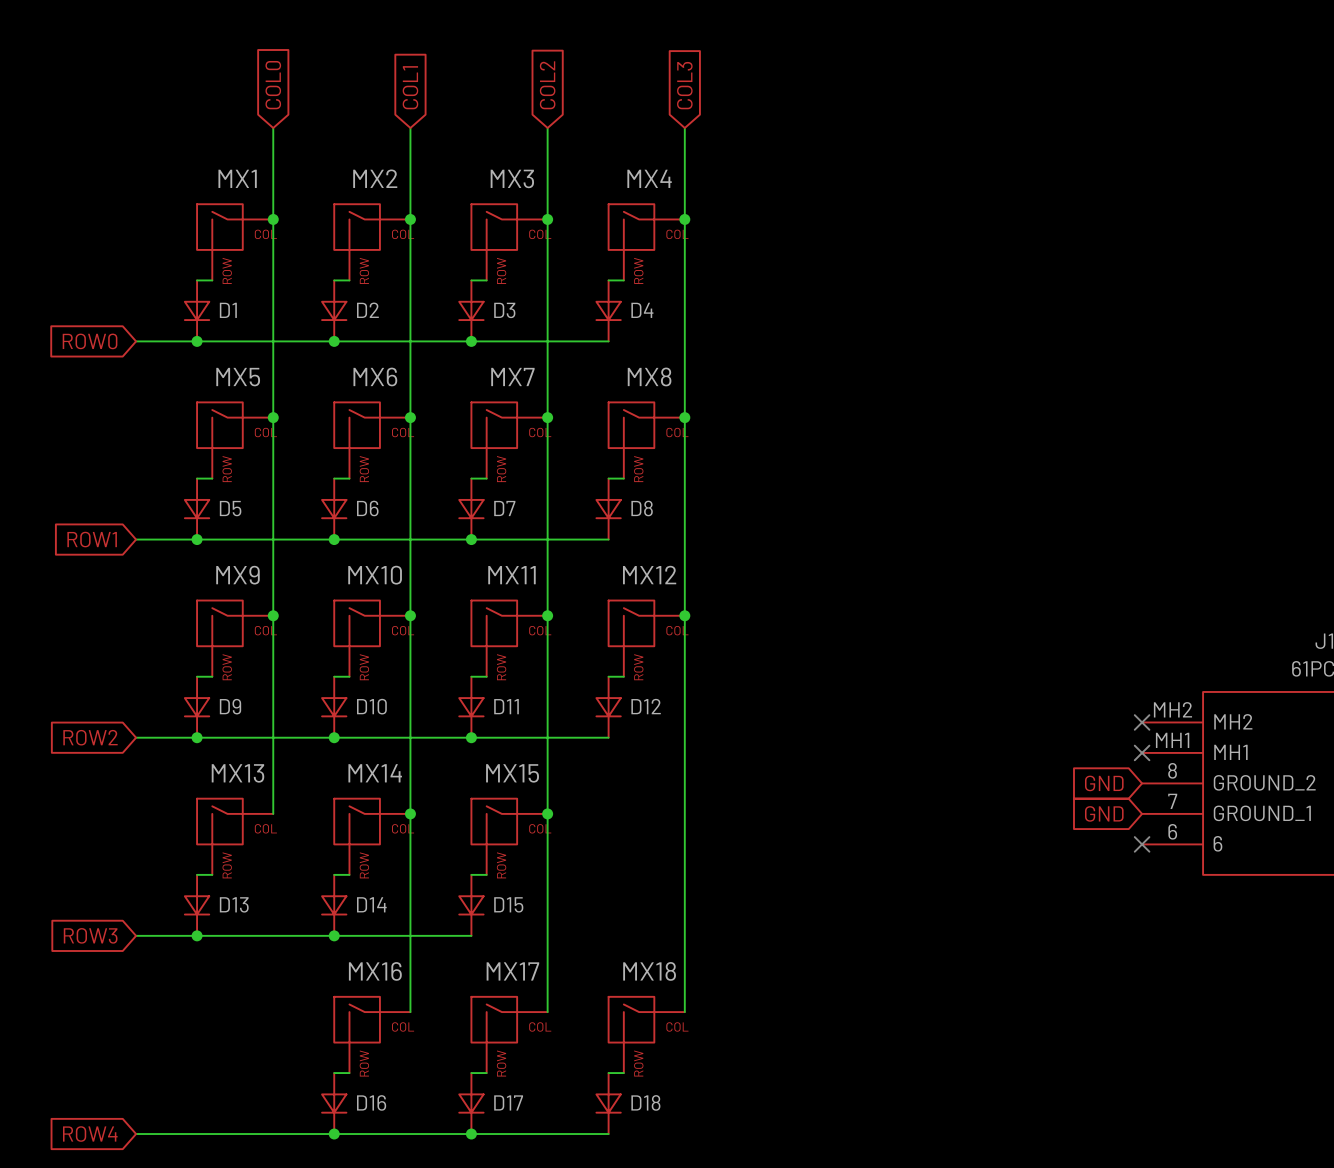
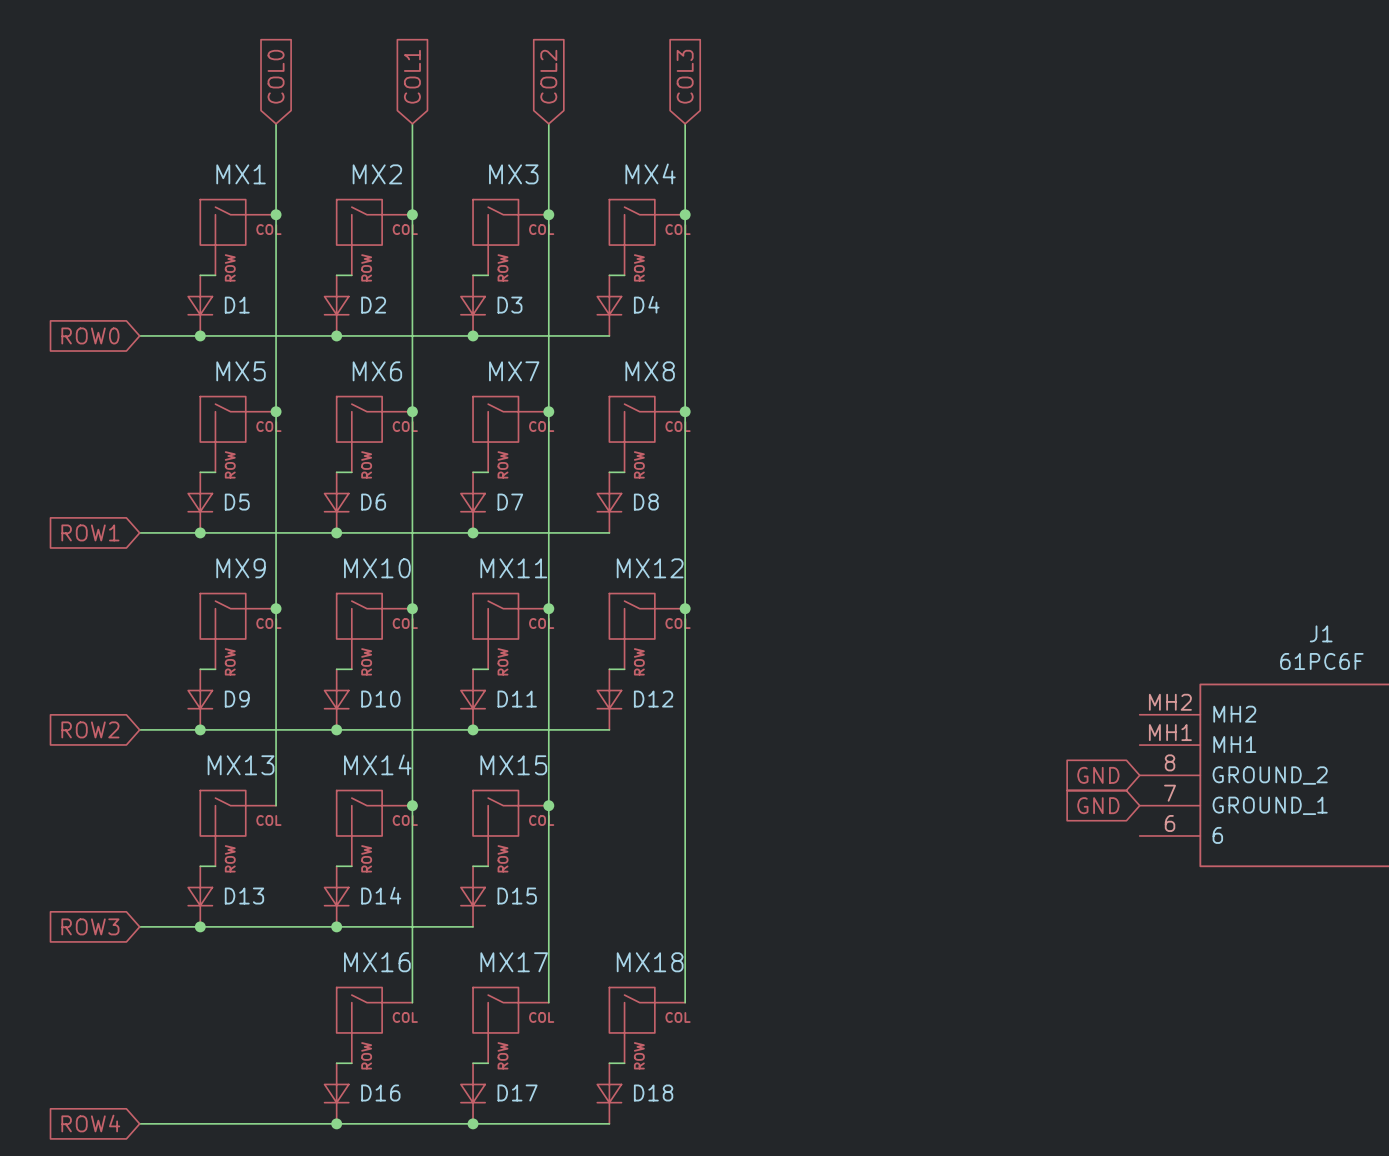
no-connect mark: (1142, 722) -> none
no-connect mark: (1142, 752) -> none
no-connect mark: (1142, 844) -> none

